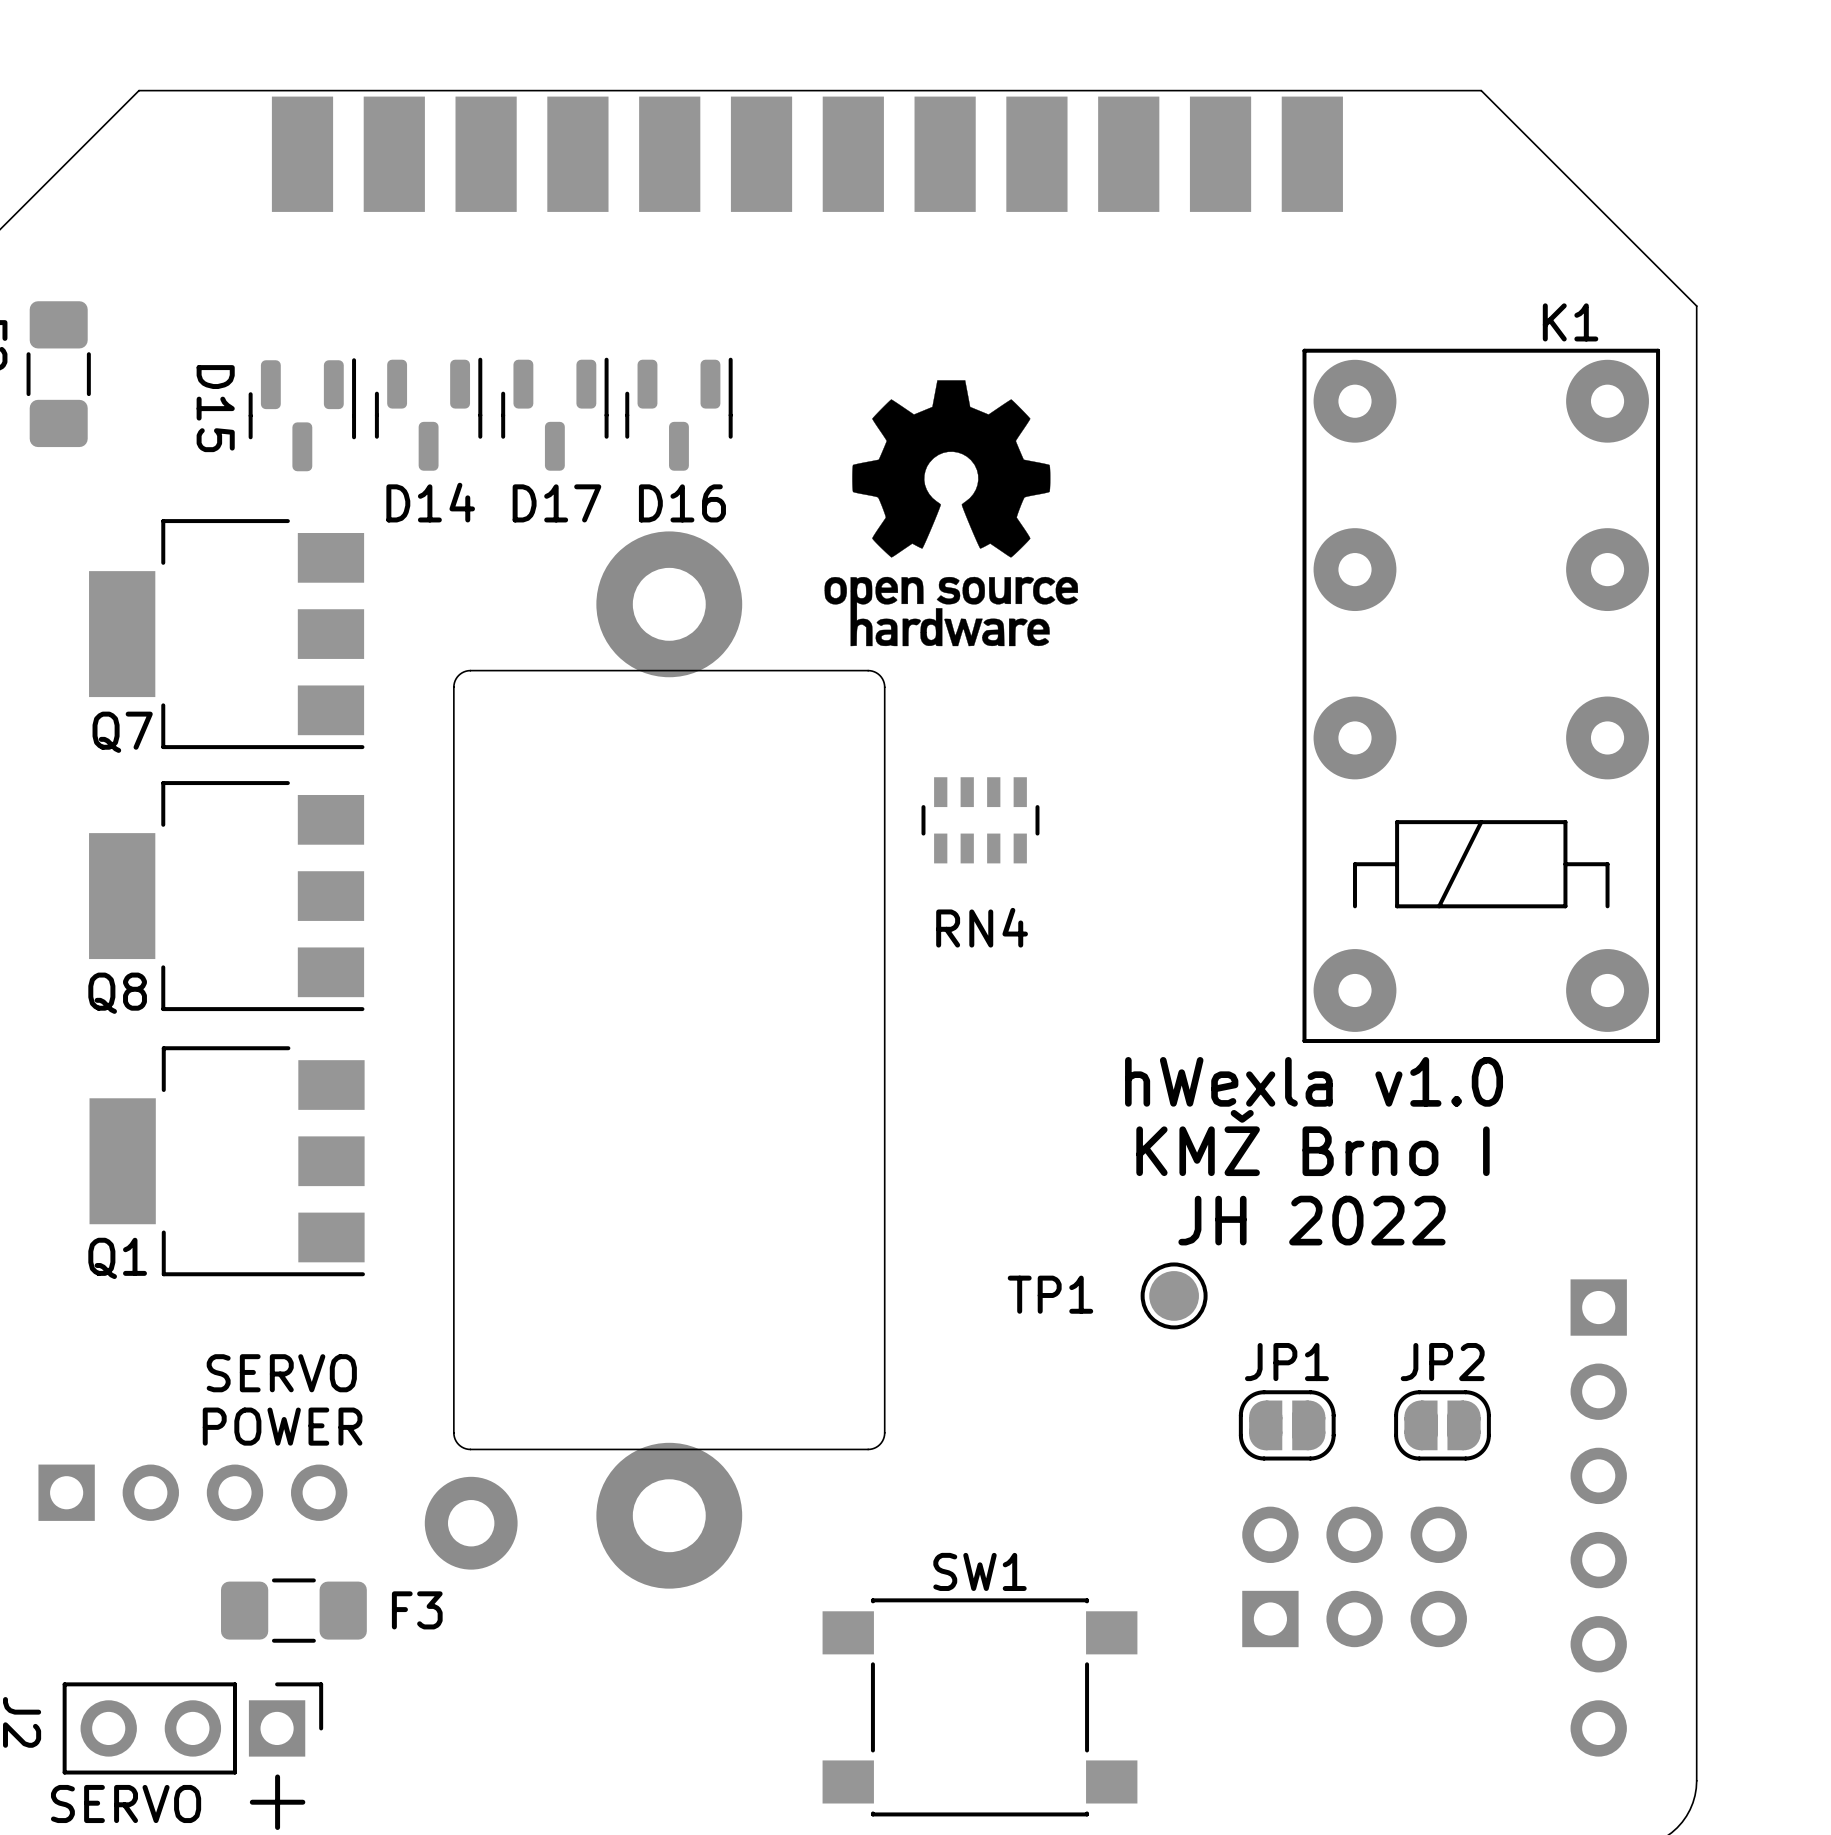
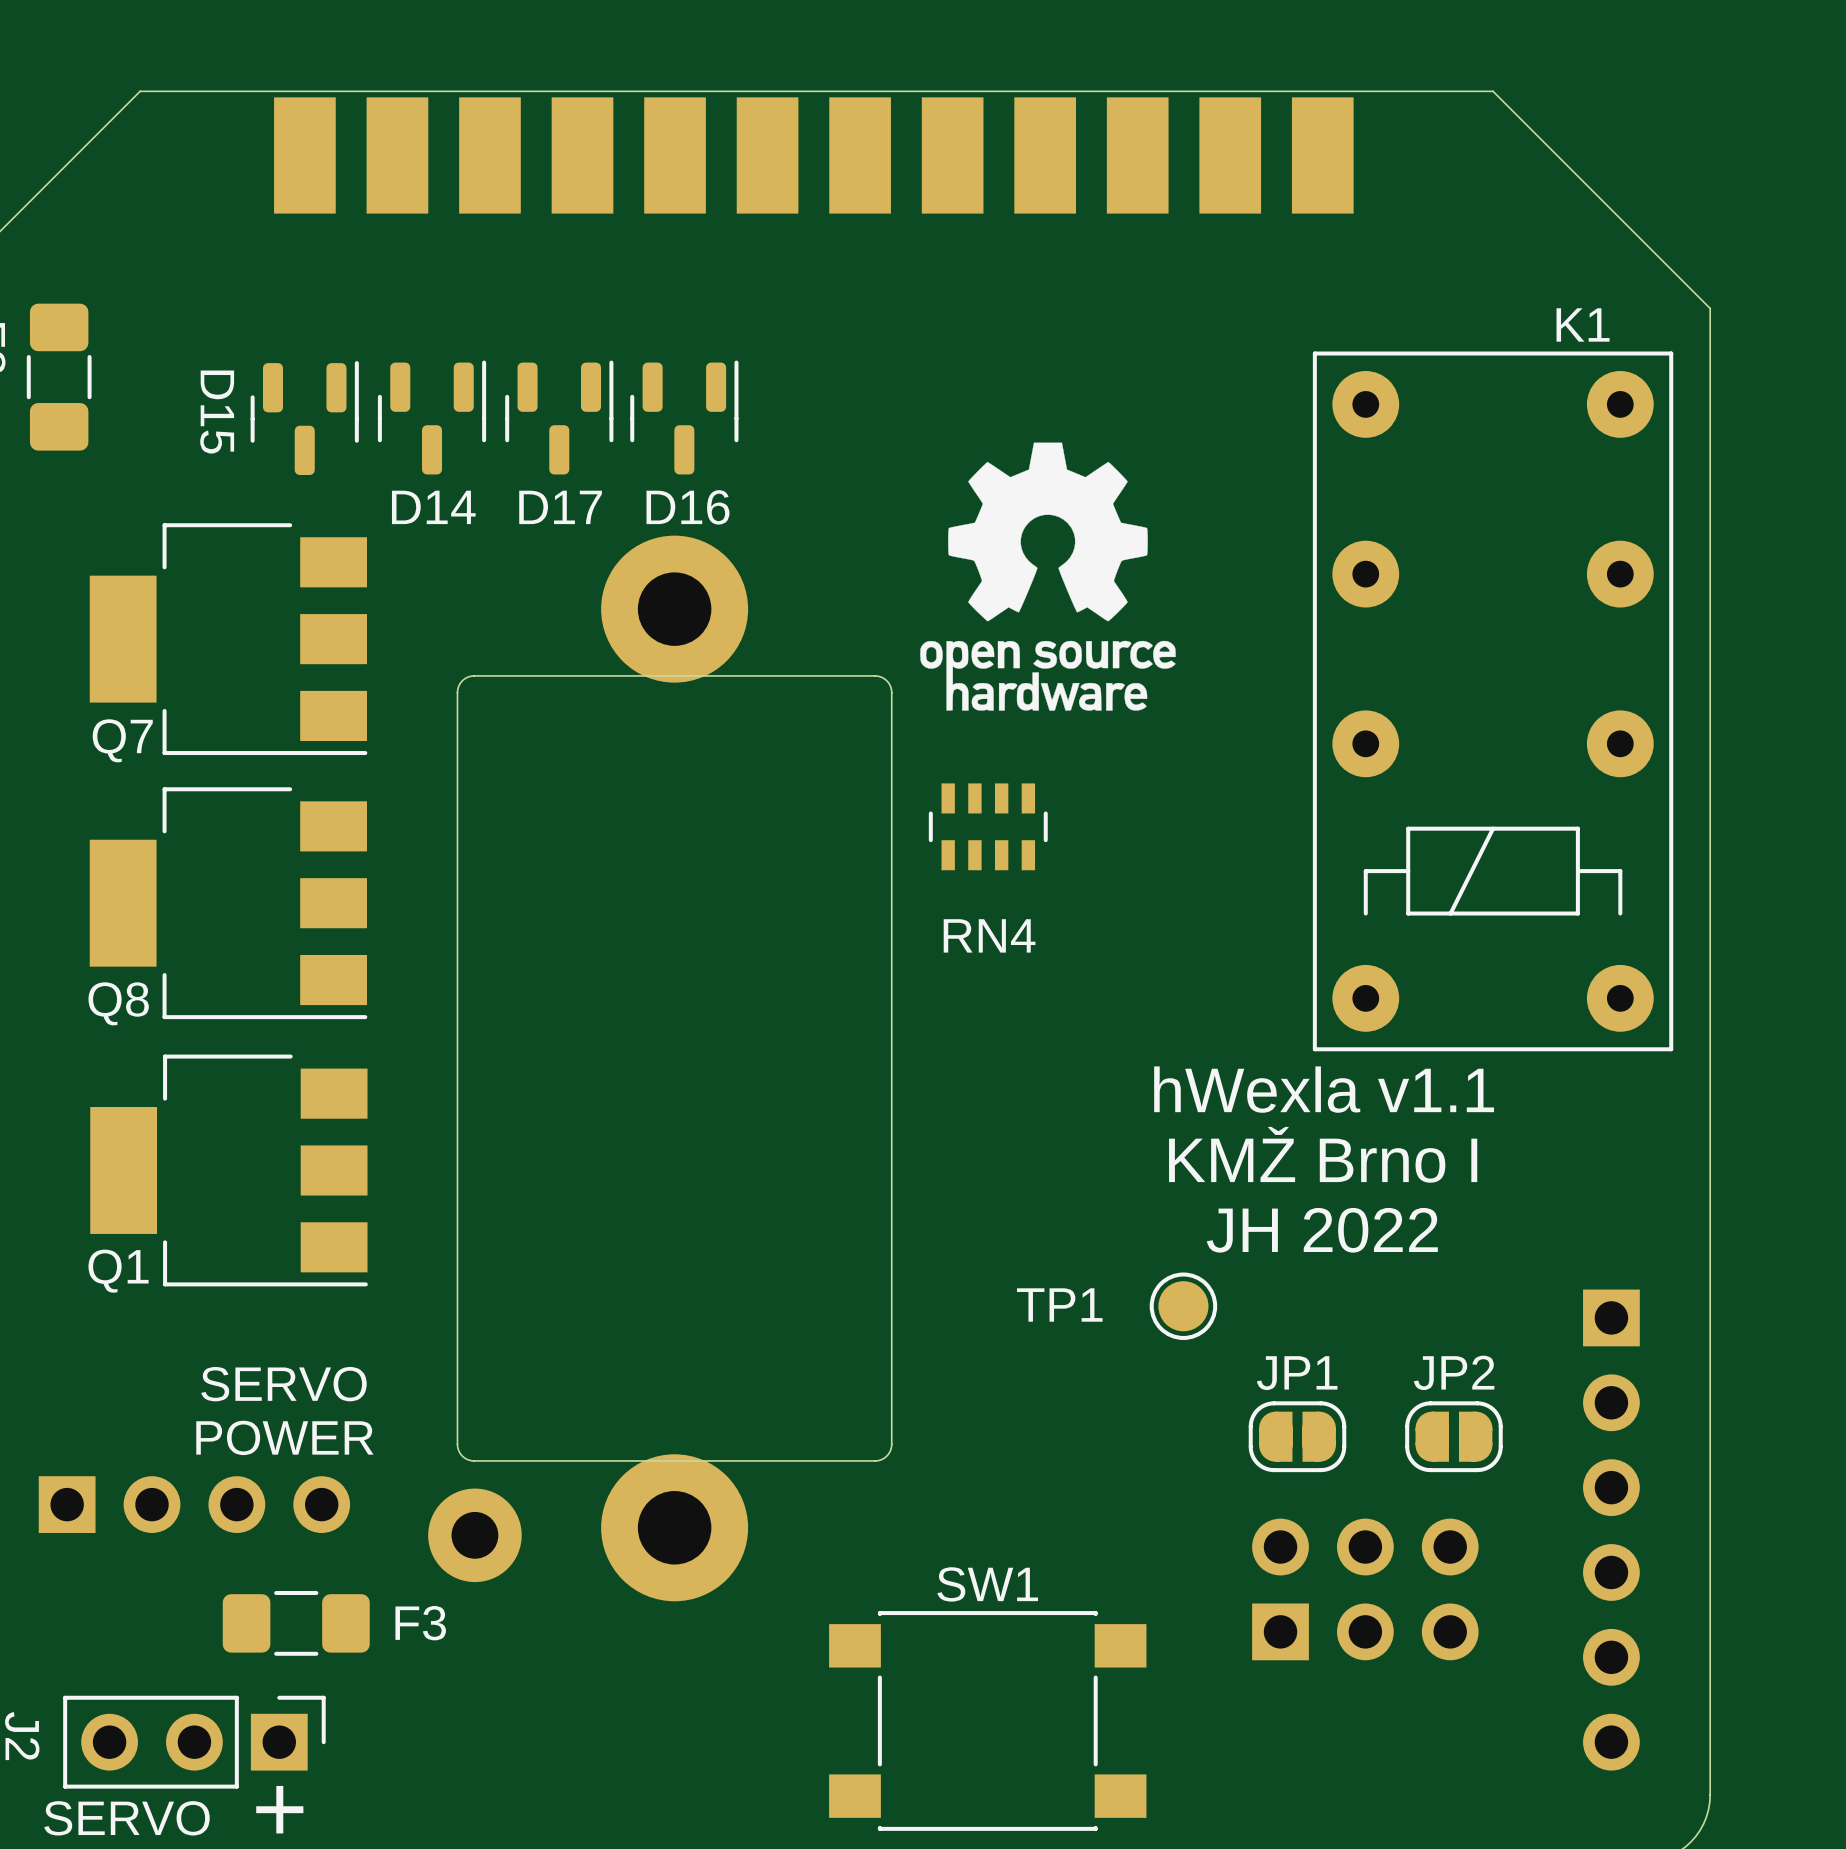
K1 footprint: [1302, 348, 1661, 1043] -> [1312, 351, 1674, 1052]
drawing position: (951, 513) -> (1047, 576)
text: hWexla v1.0 (1314, 1081) -> hWexla v1.1 (1324, 1089)

